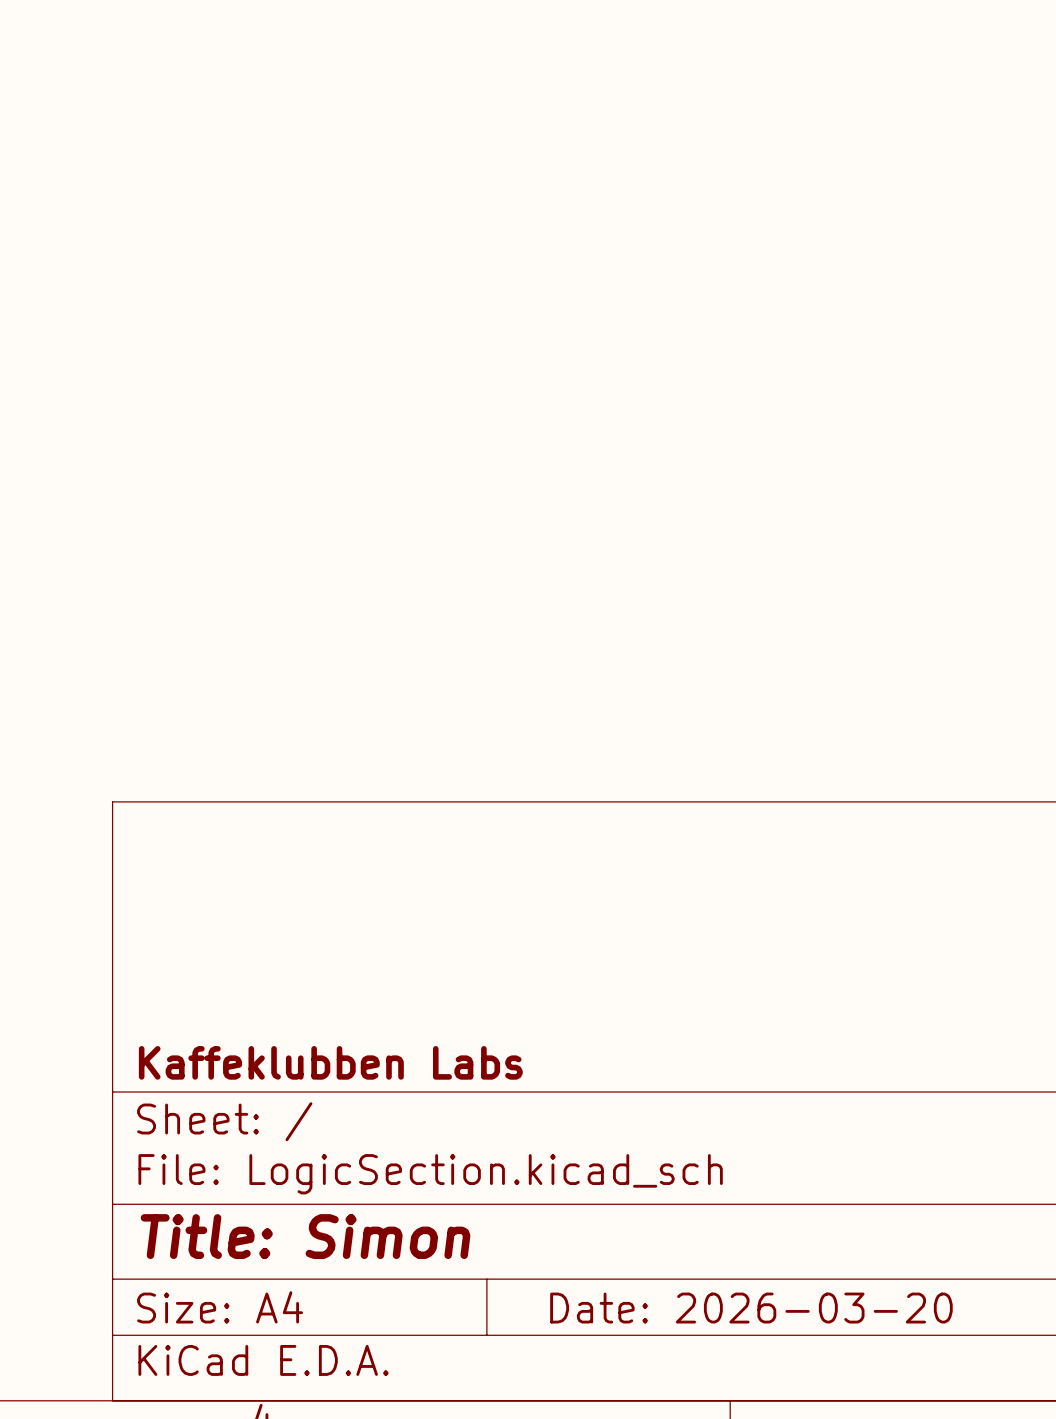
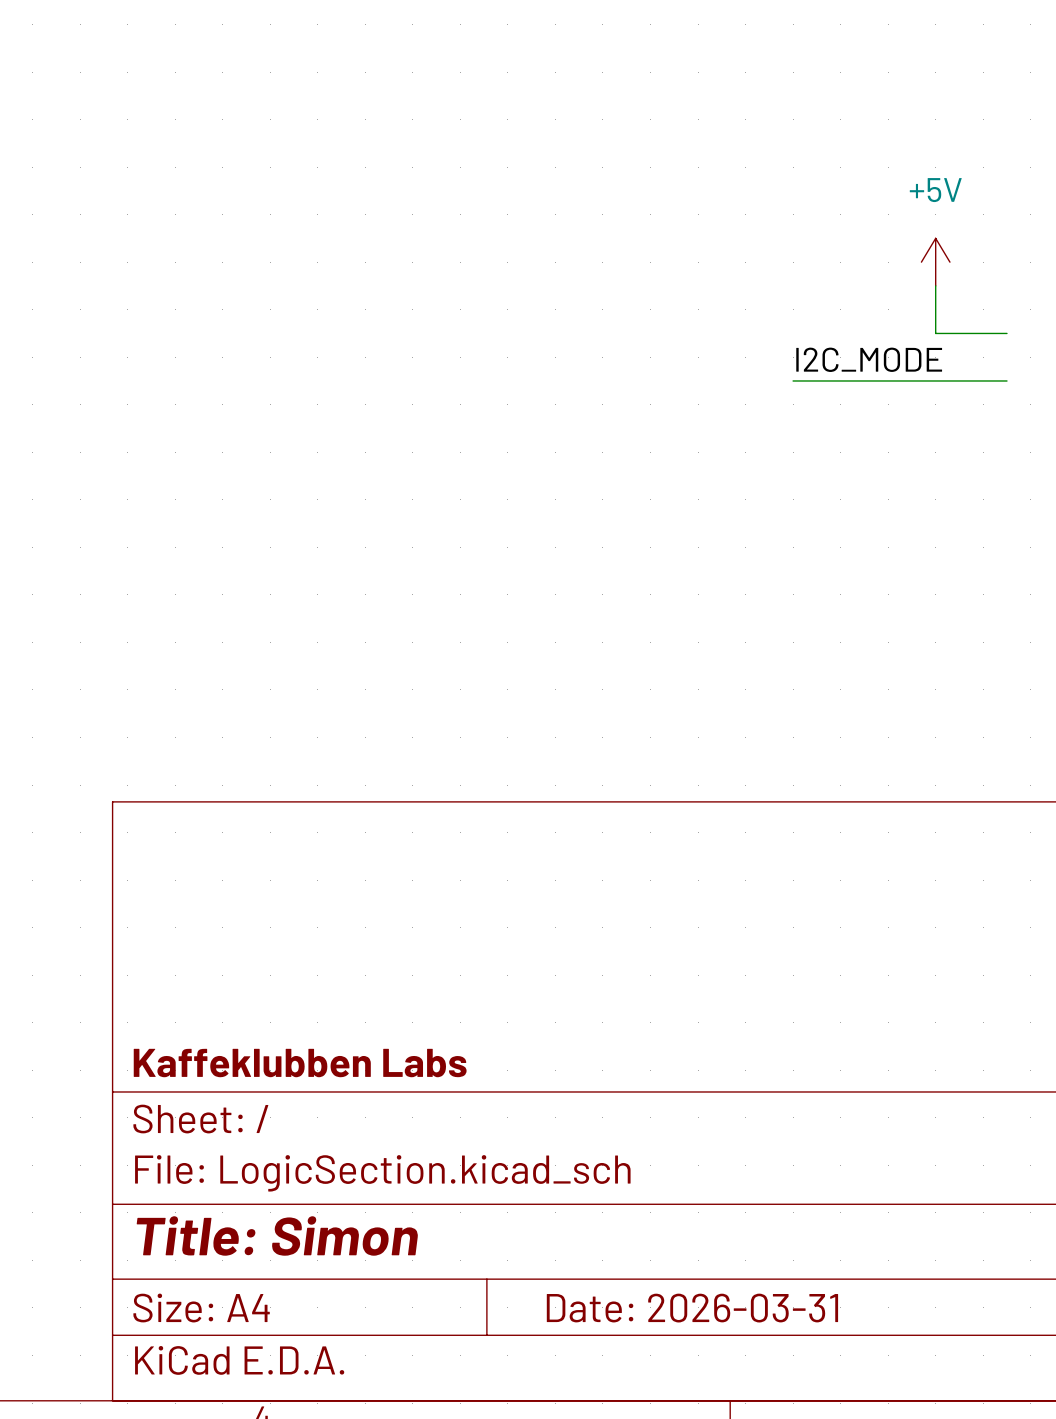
power symbol: none -> +5V (935, 262)
wire: none -> (935, 285) (935, 333) (1007, 333)
label: none -> I2C_MODE (869, 359)
wire: none -> (793, 380) (1007, 380)
title block: Date: 2026-03-20 (751, 1308) -> Date: 2026-03-31 (692, 1308)

